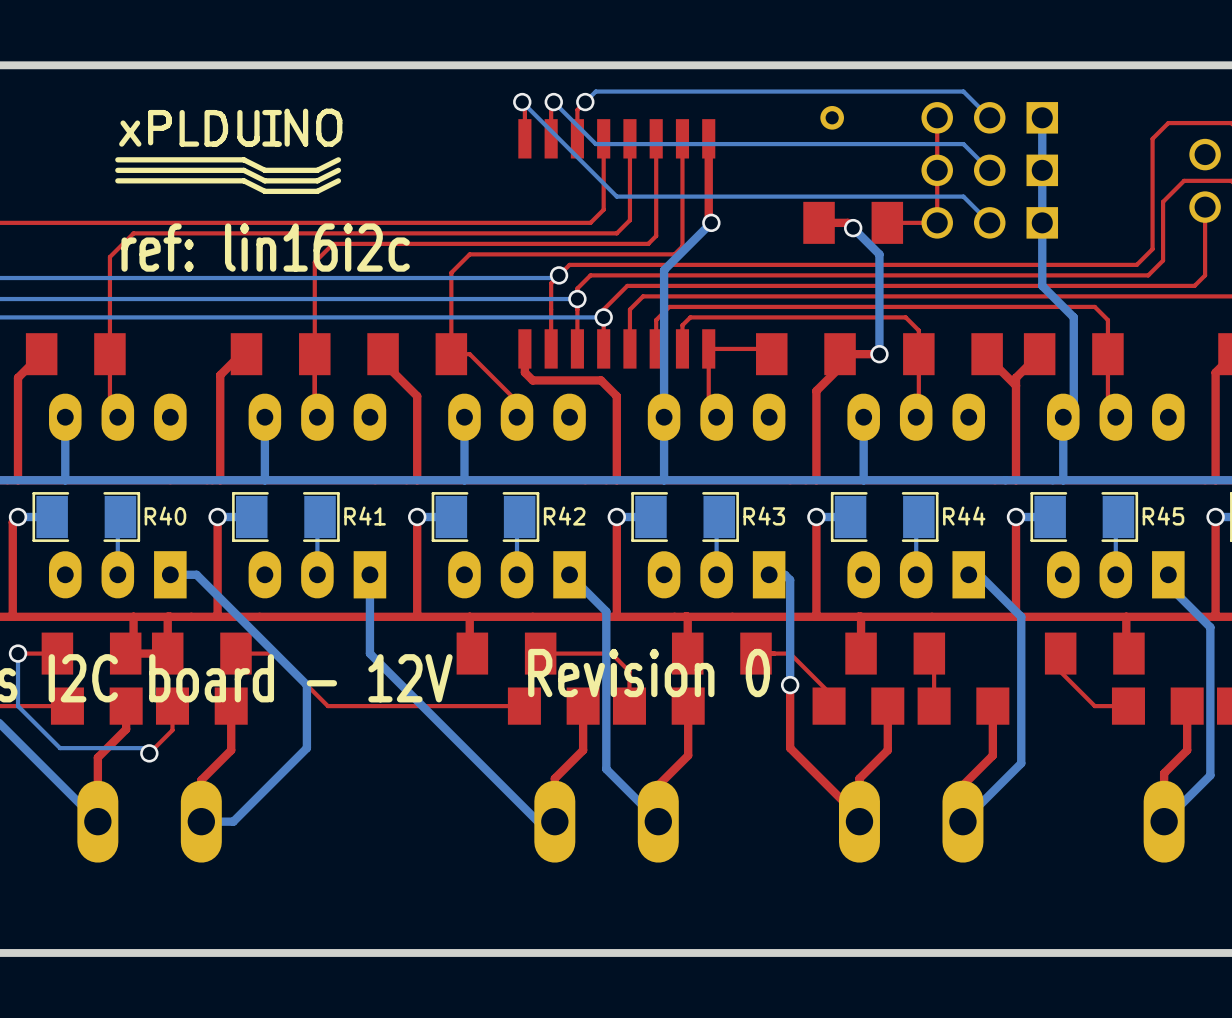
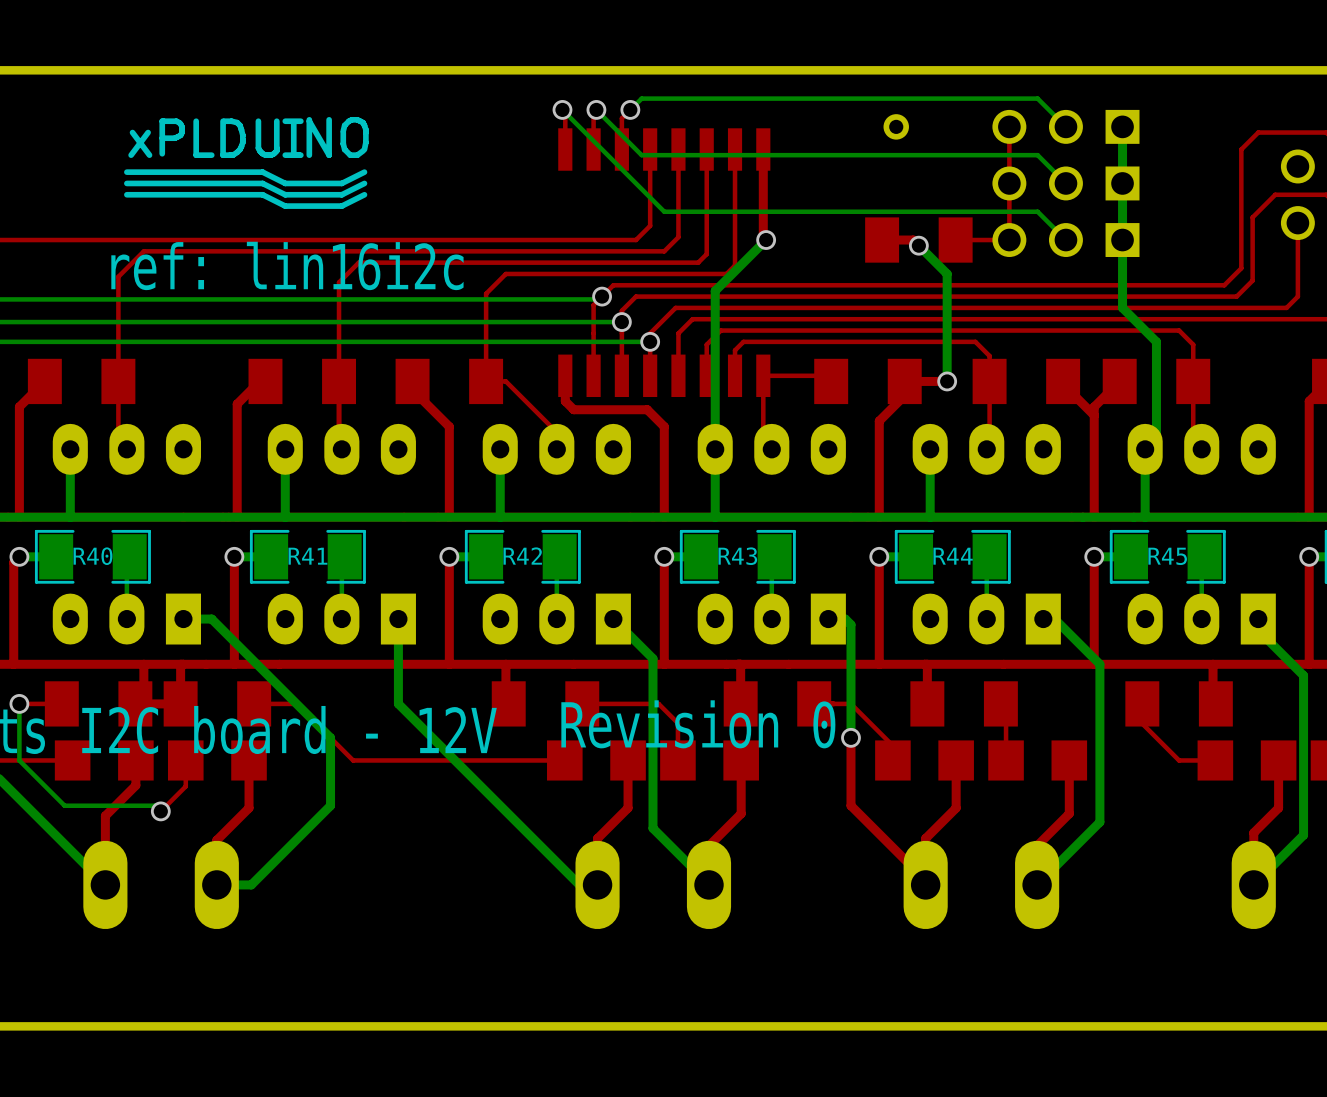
R40 name position: R40 (165, 516) -> R40 (93, 556)
R41 name position: R41 (365, 516) -> R41 (307, 556)
R42 name position: R42 (564, 516) -> R42 (522, 556)
R43 name position: R43 (764, 516) -> R43 (737, 556)
R44 name position: R44 (964, 516) -> R44 (953, 556)
R45 name position: R45 (1163, 516) -> R45 (1167, 556)

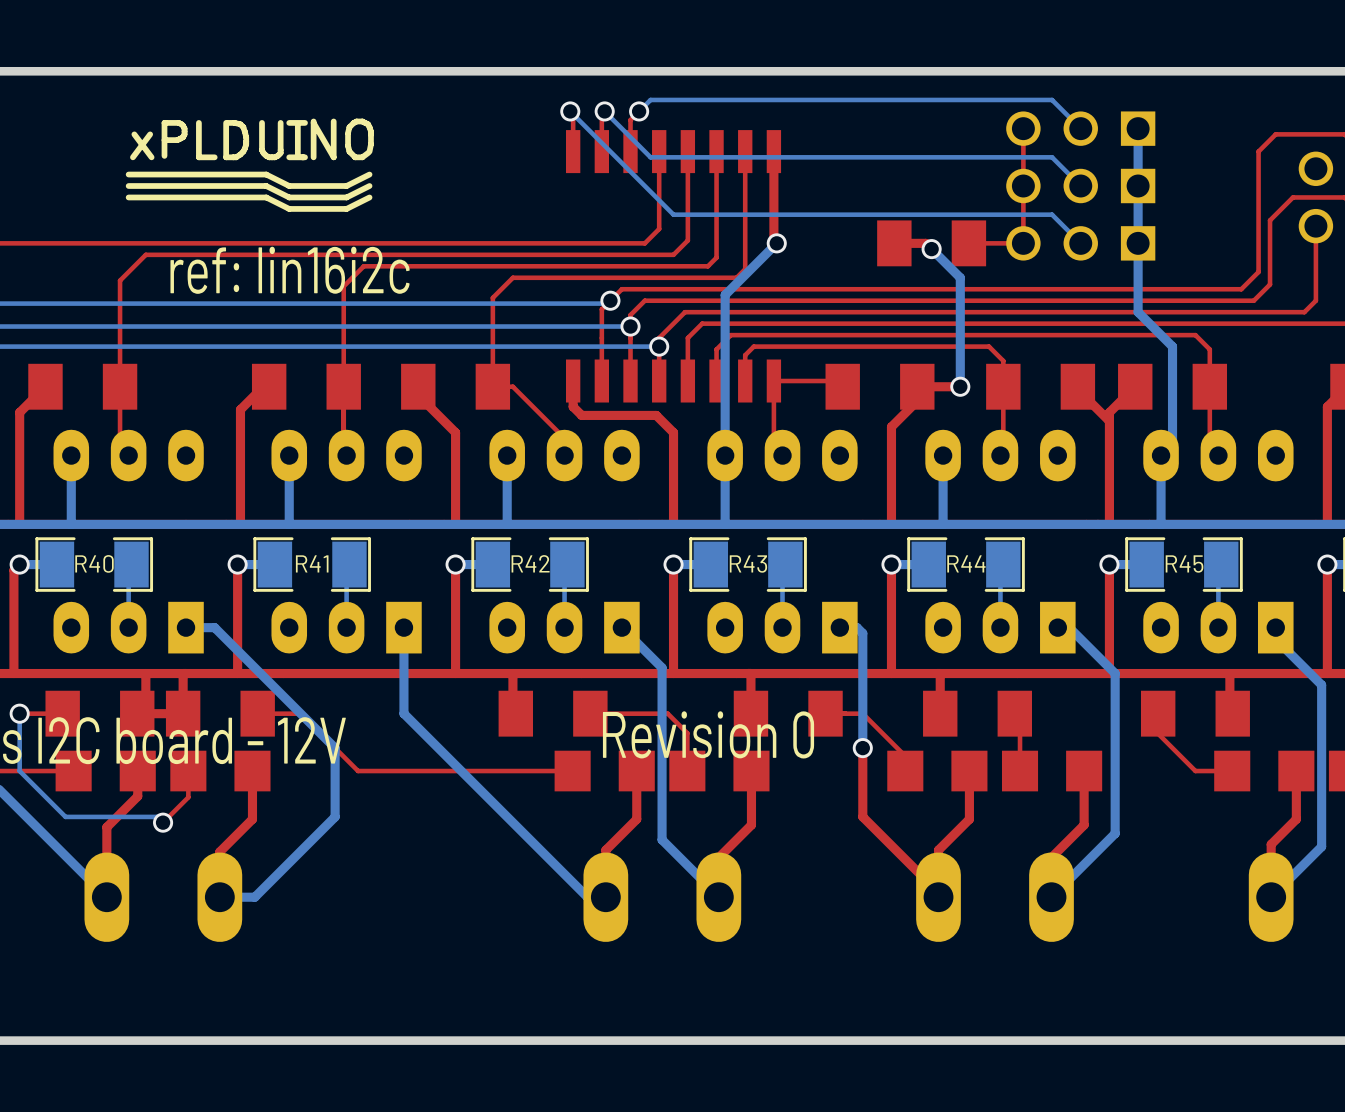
part: (896, 126) -> none

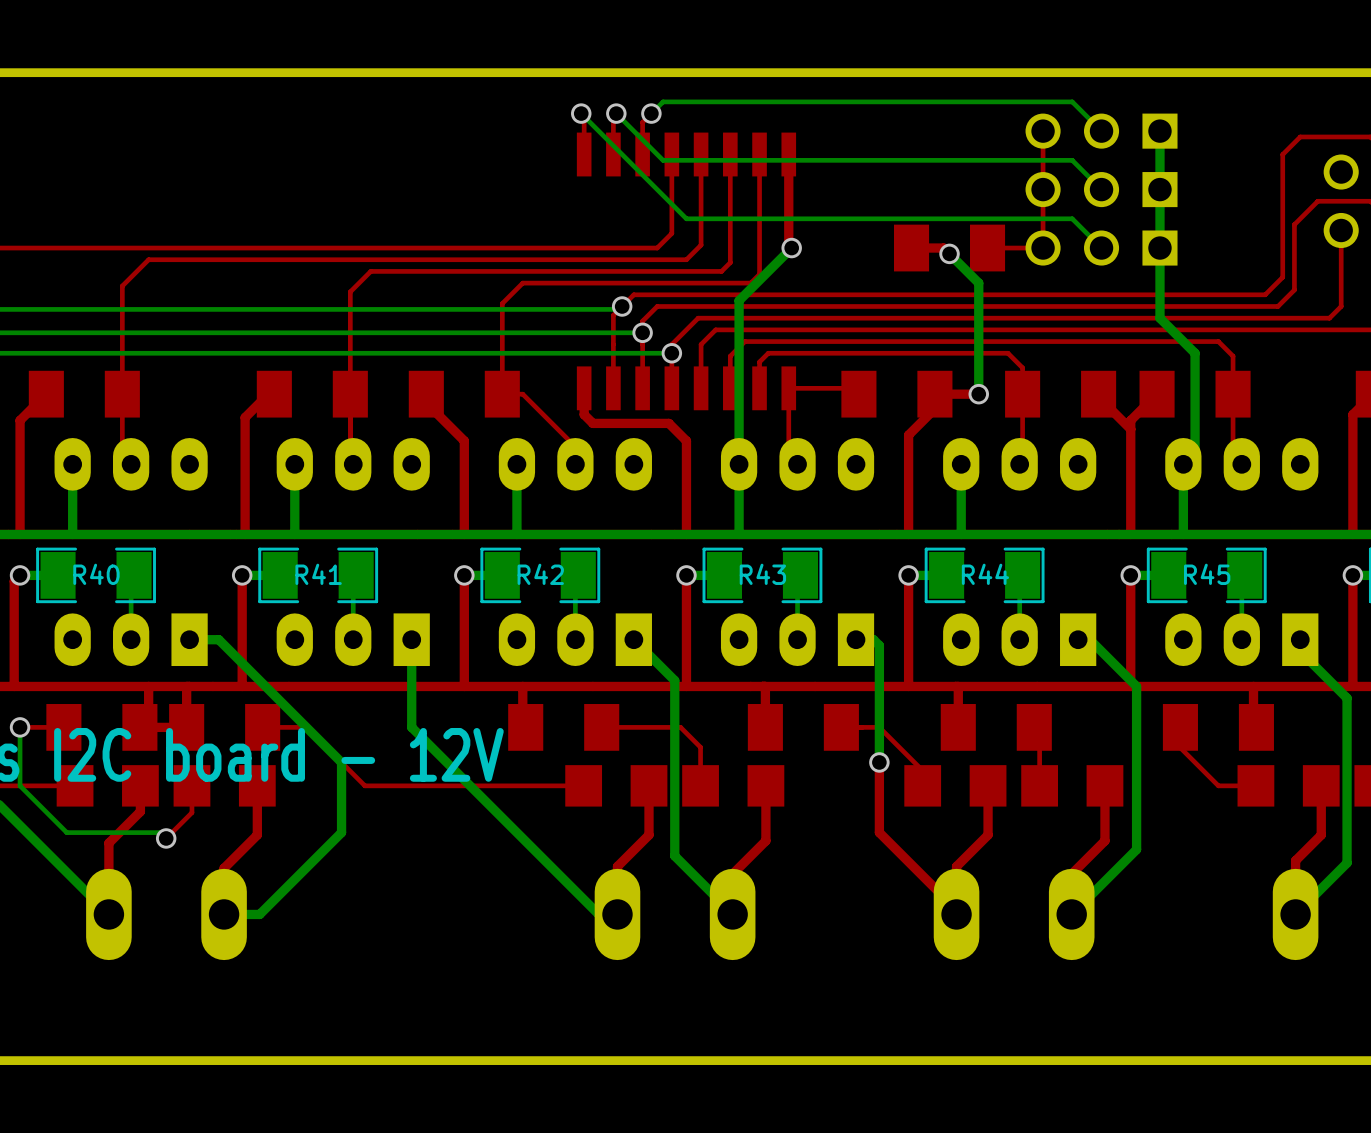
drawing: [125, 118, 374, 212] -> none
text: ref: lin16i2c (290, 270) -> none
text: Revision 0 (708, 734) -> none

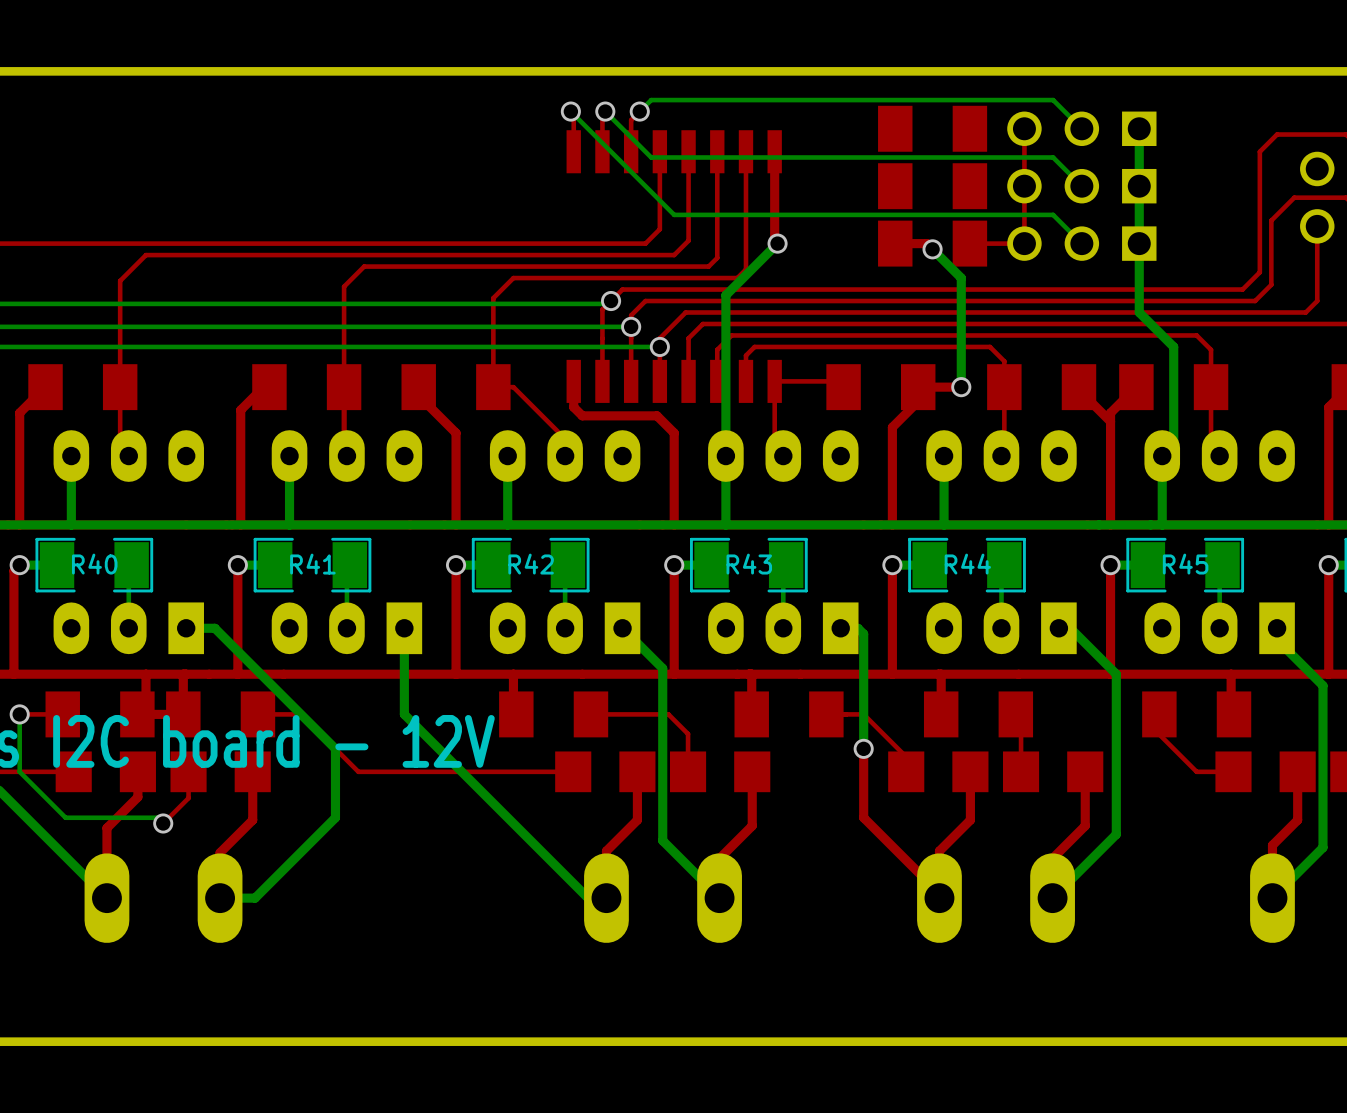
part: none -> (932, 128)
part: none -> (932, 186)

